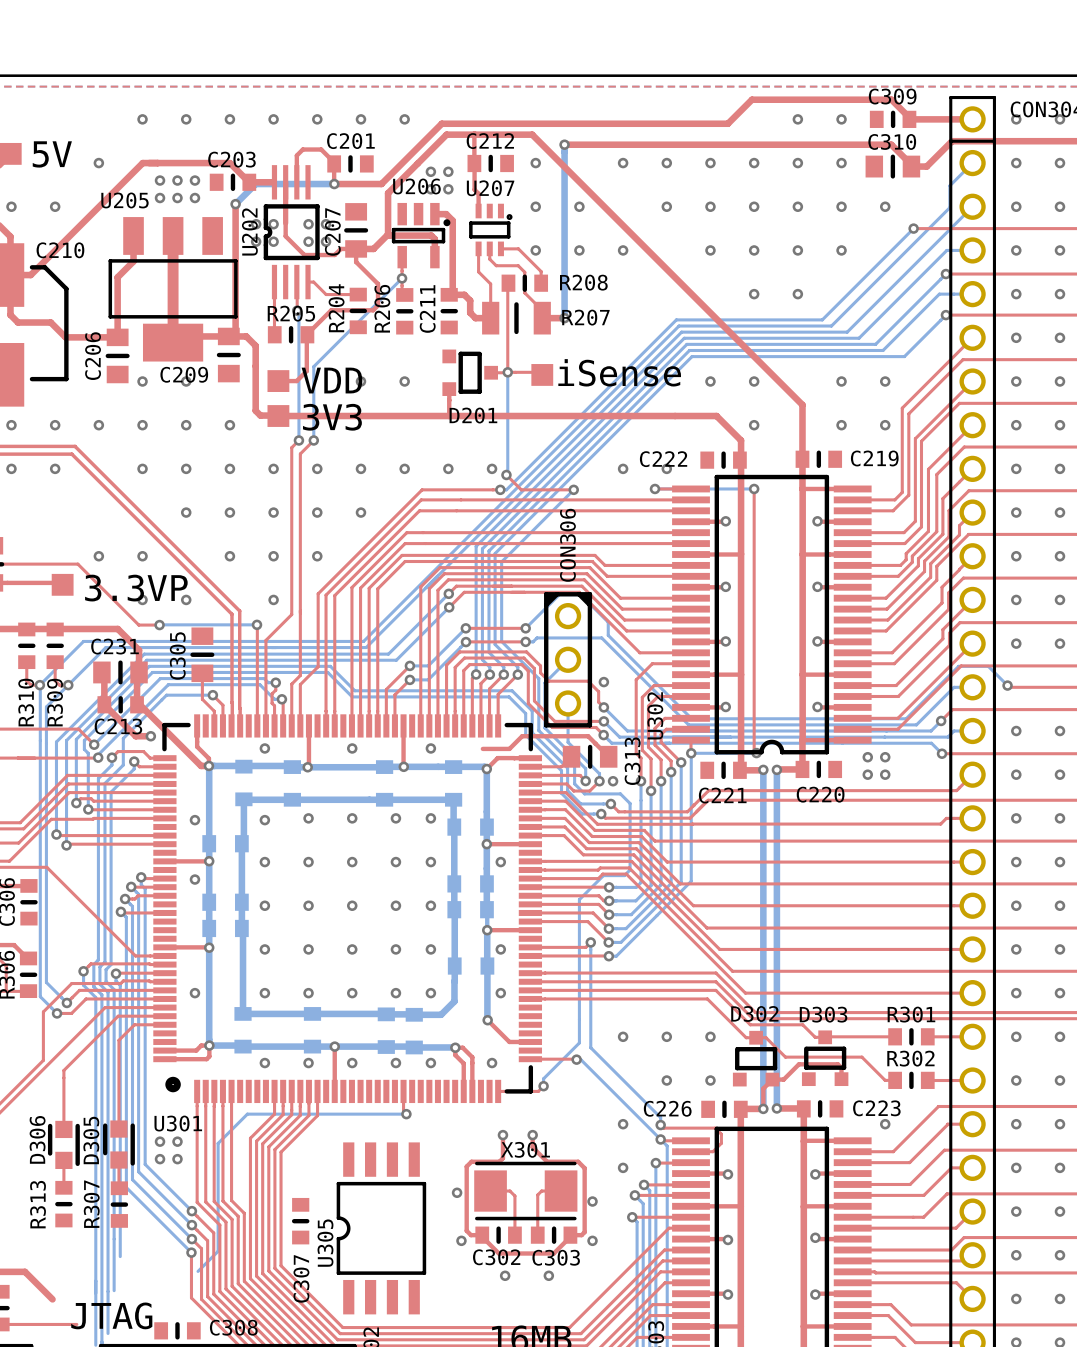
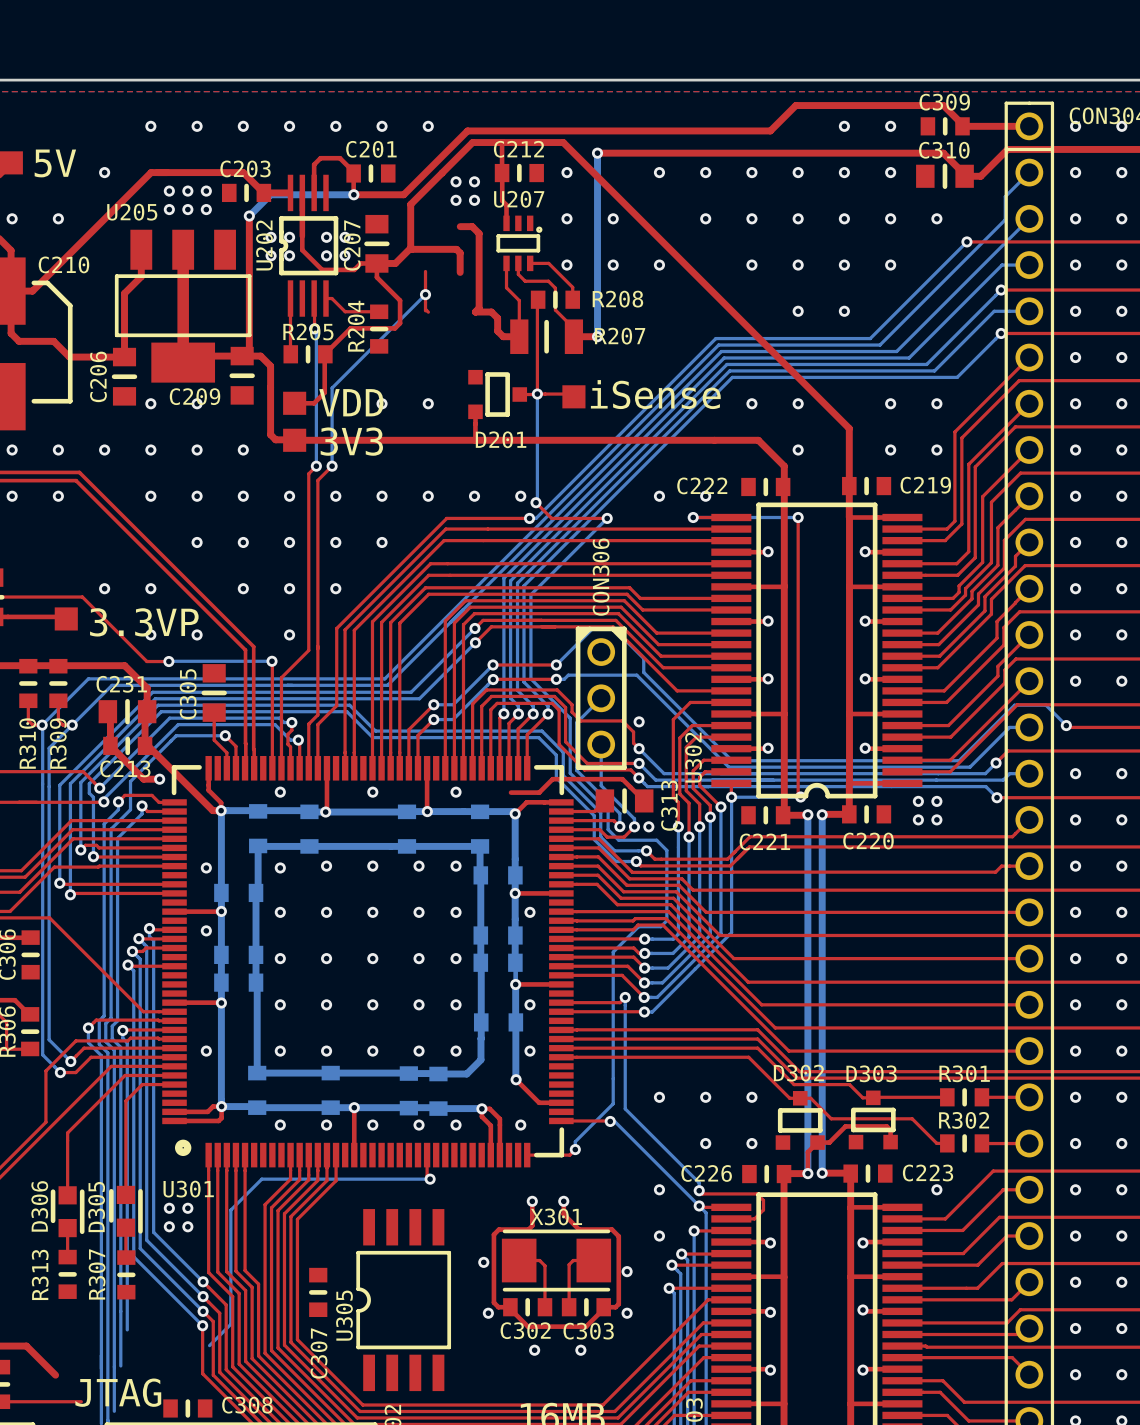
U206: (421, 235) -> none
R206: (404, 311) -> none
C211: (449, 311) -> none

